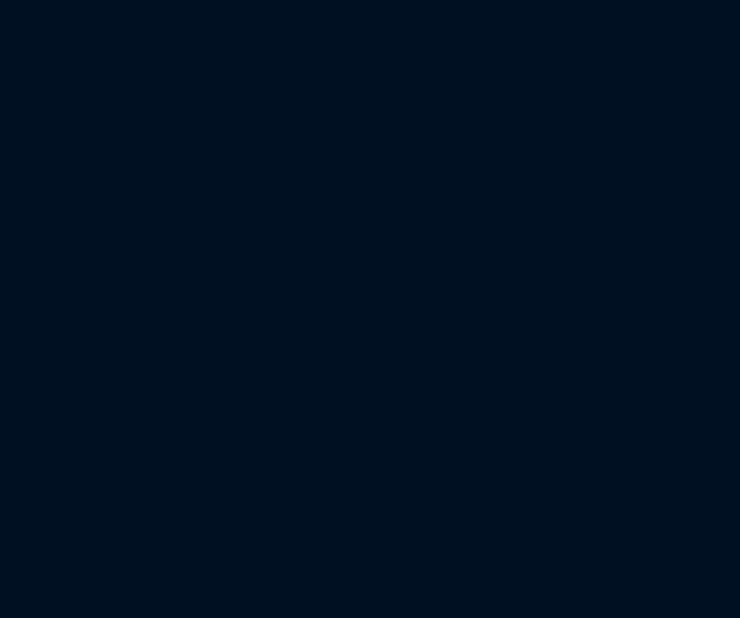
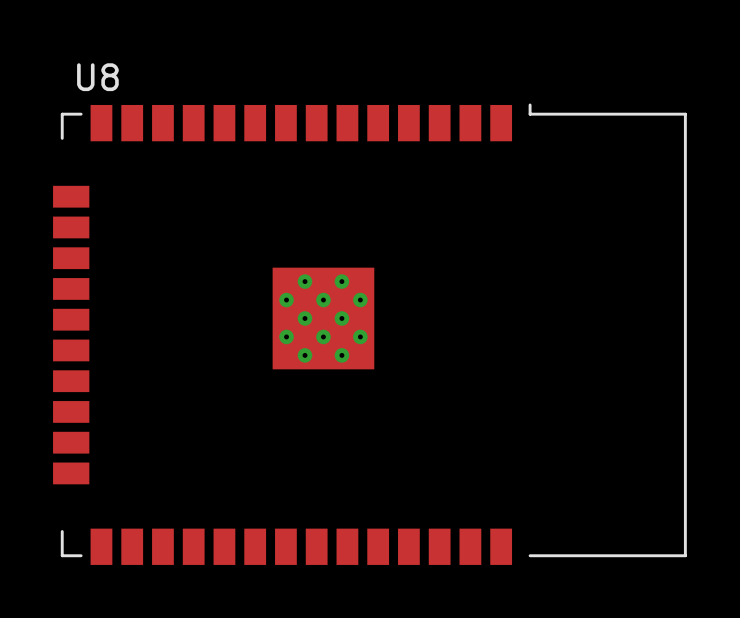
U8: none -> (369, 334)

